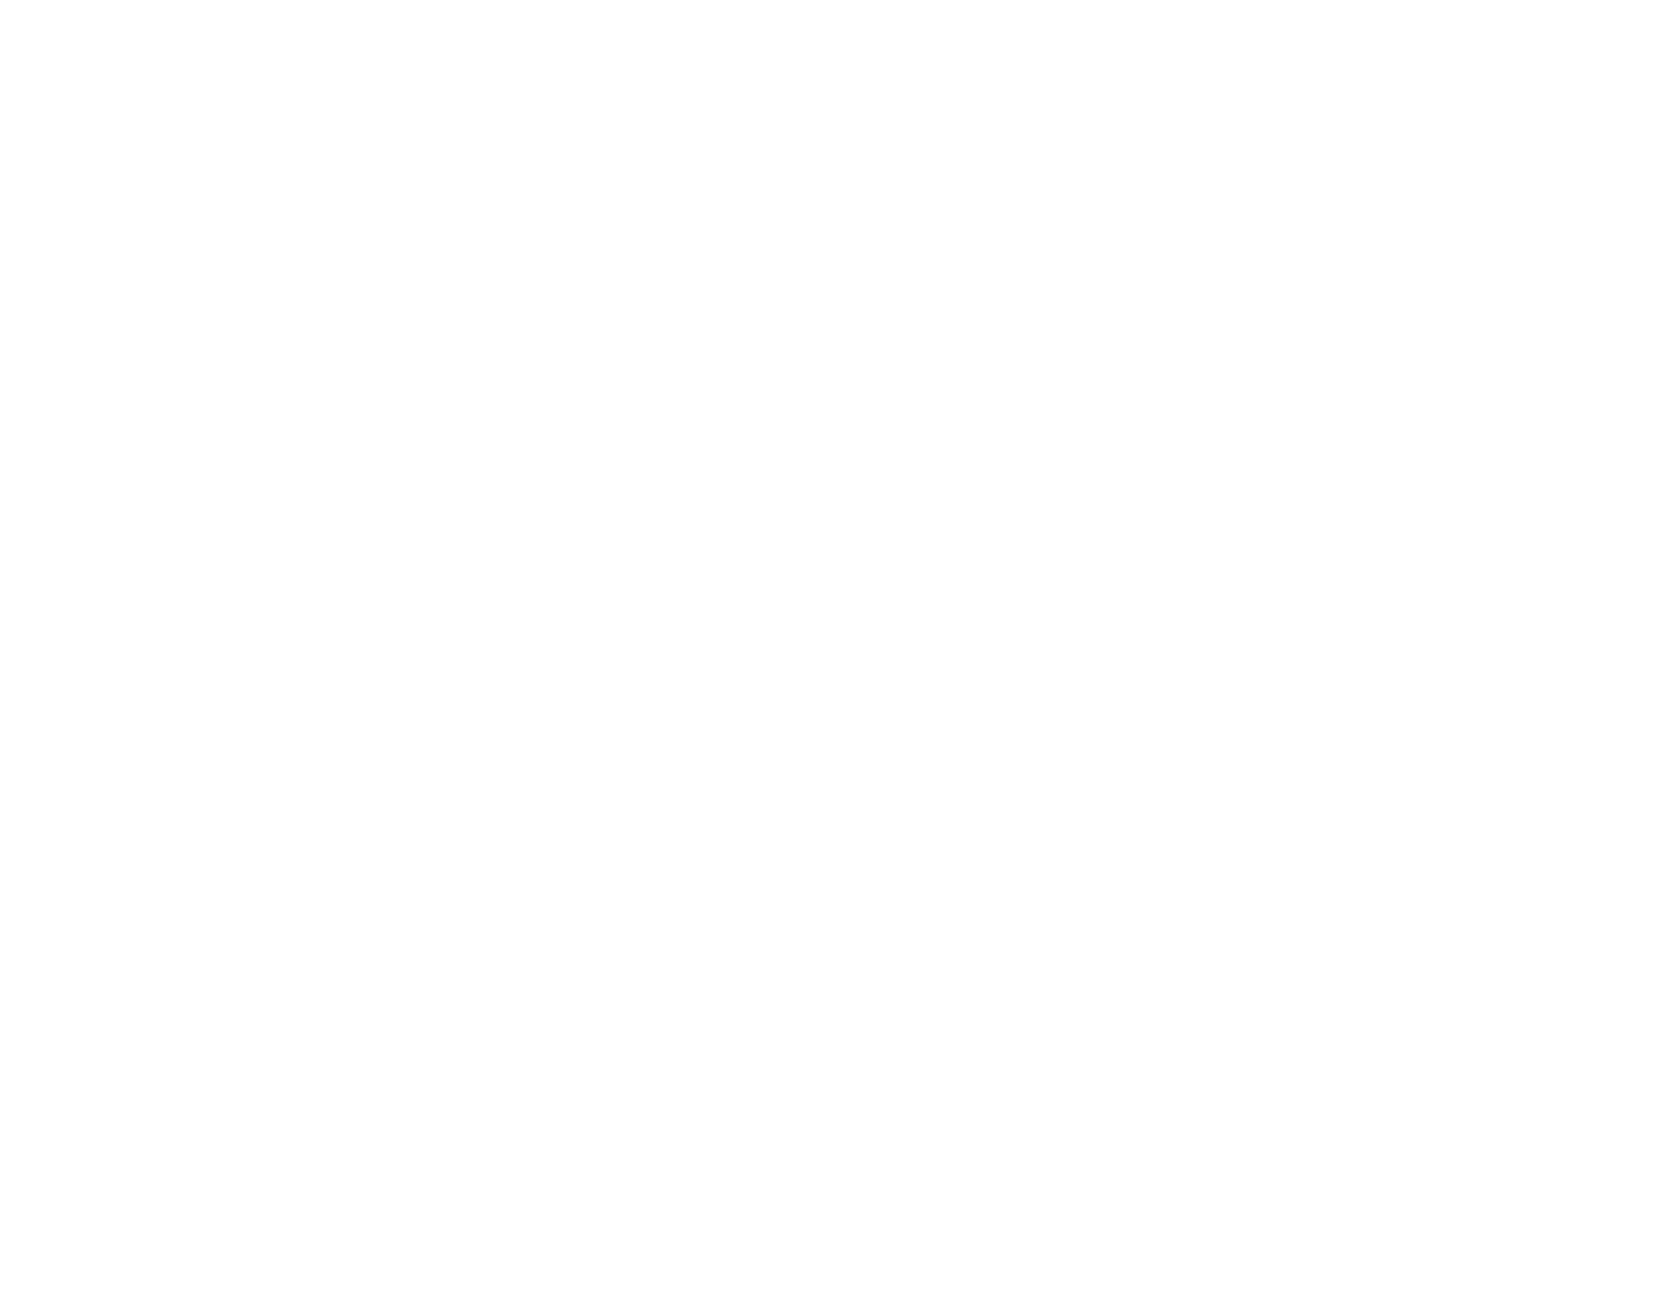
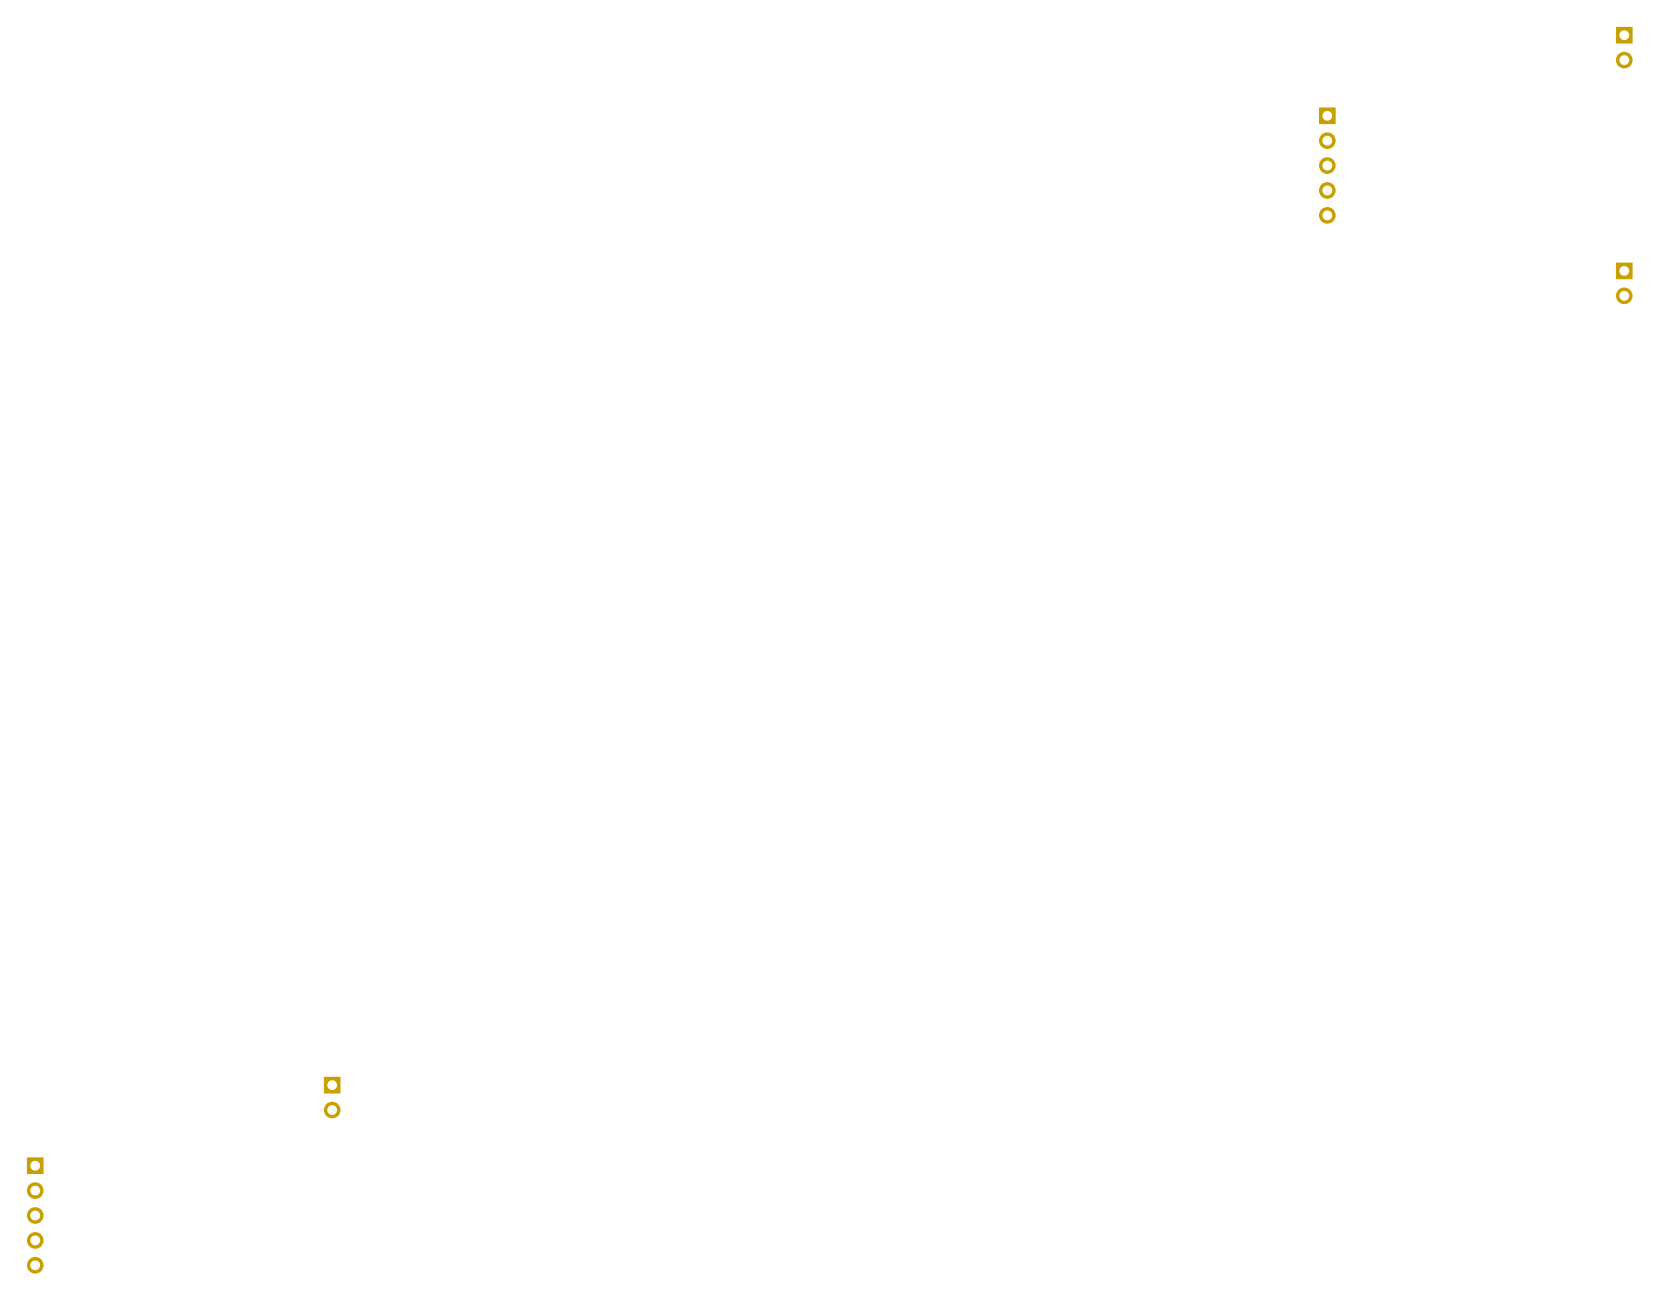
part: none -> (1624, 47)
part: none -> (1327, 165)
part: none -> (1624, 283)
part: none -> (332, 1097)
part: none -> (35, 1215)

